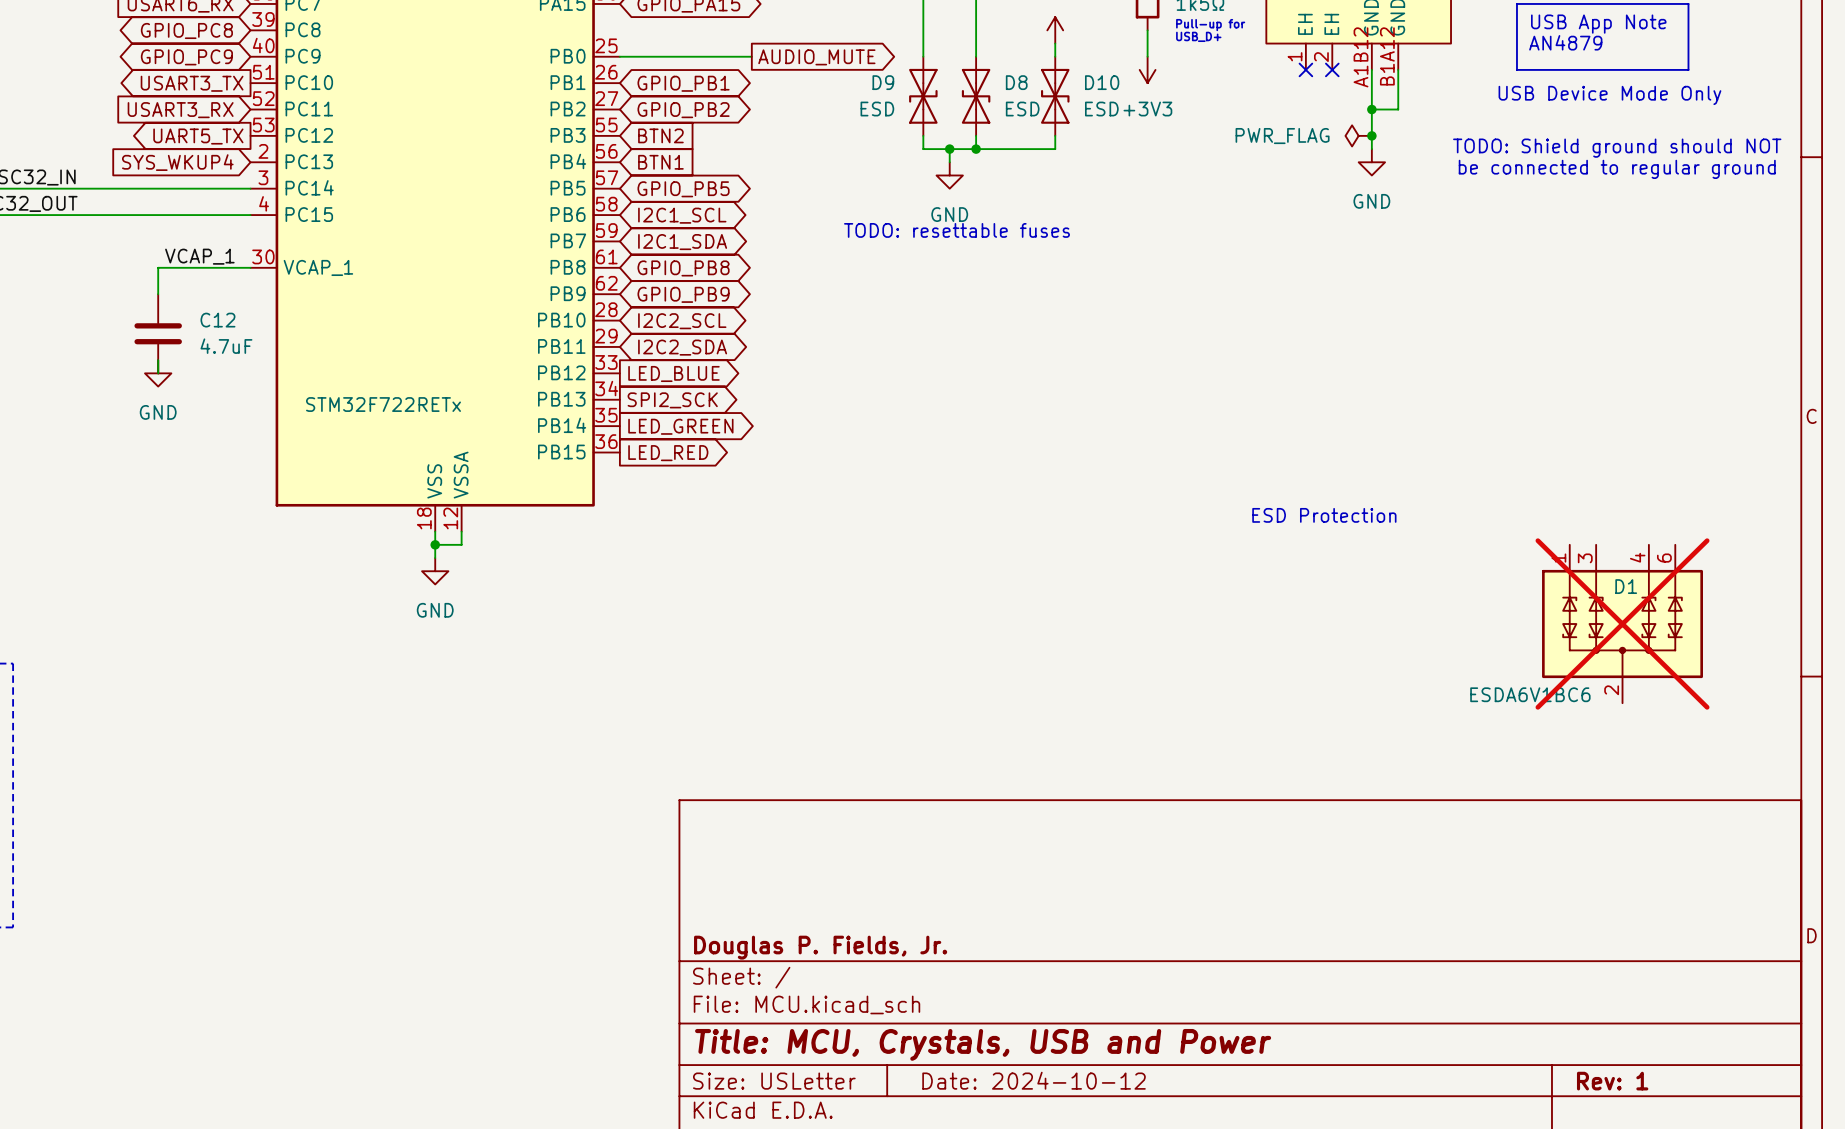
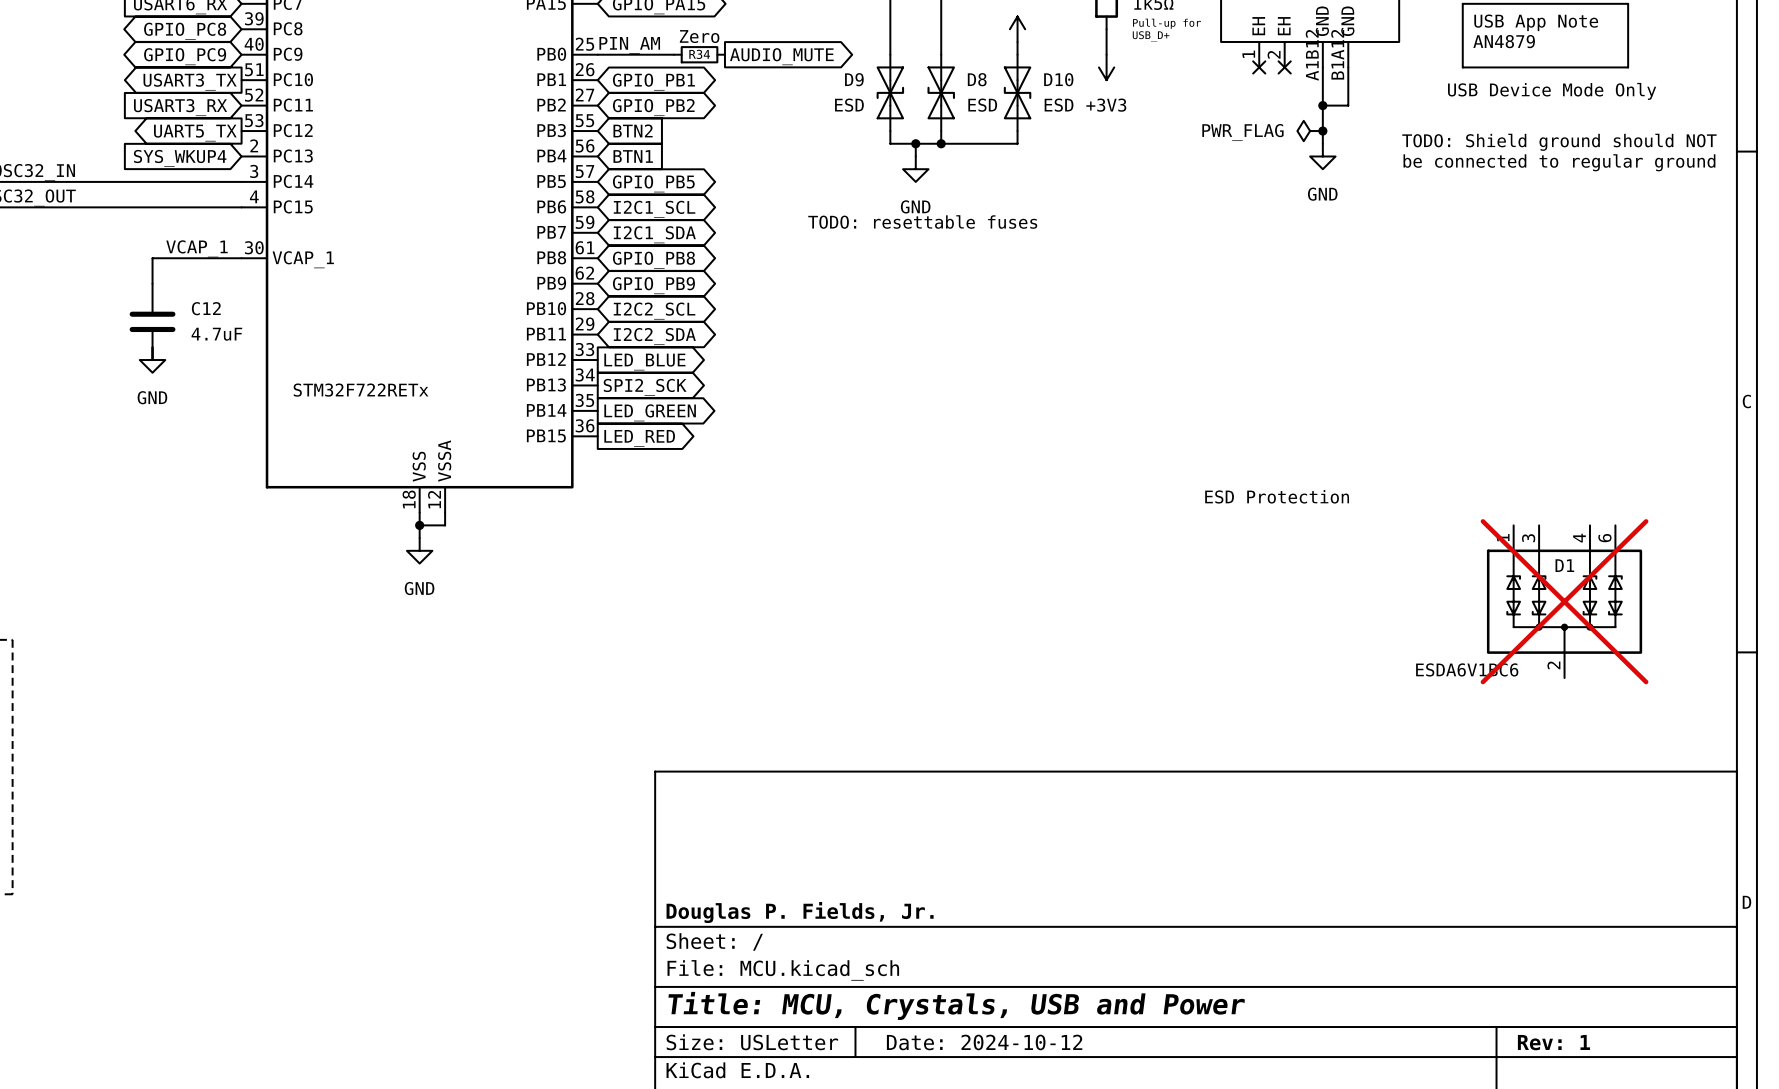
label: none -> PIN_AM (629, 45)
R34: none -> Zero (699, 54)

